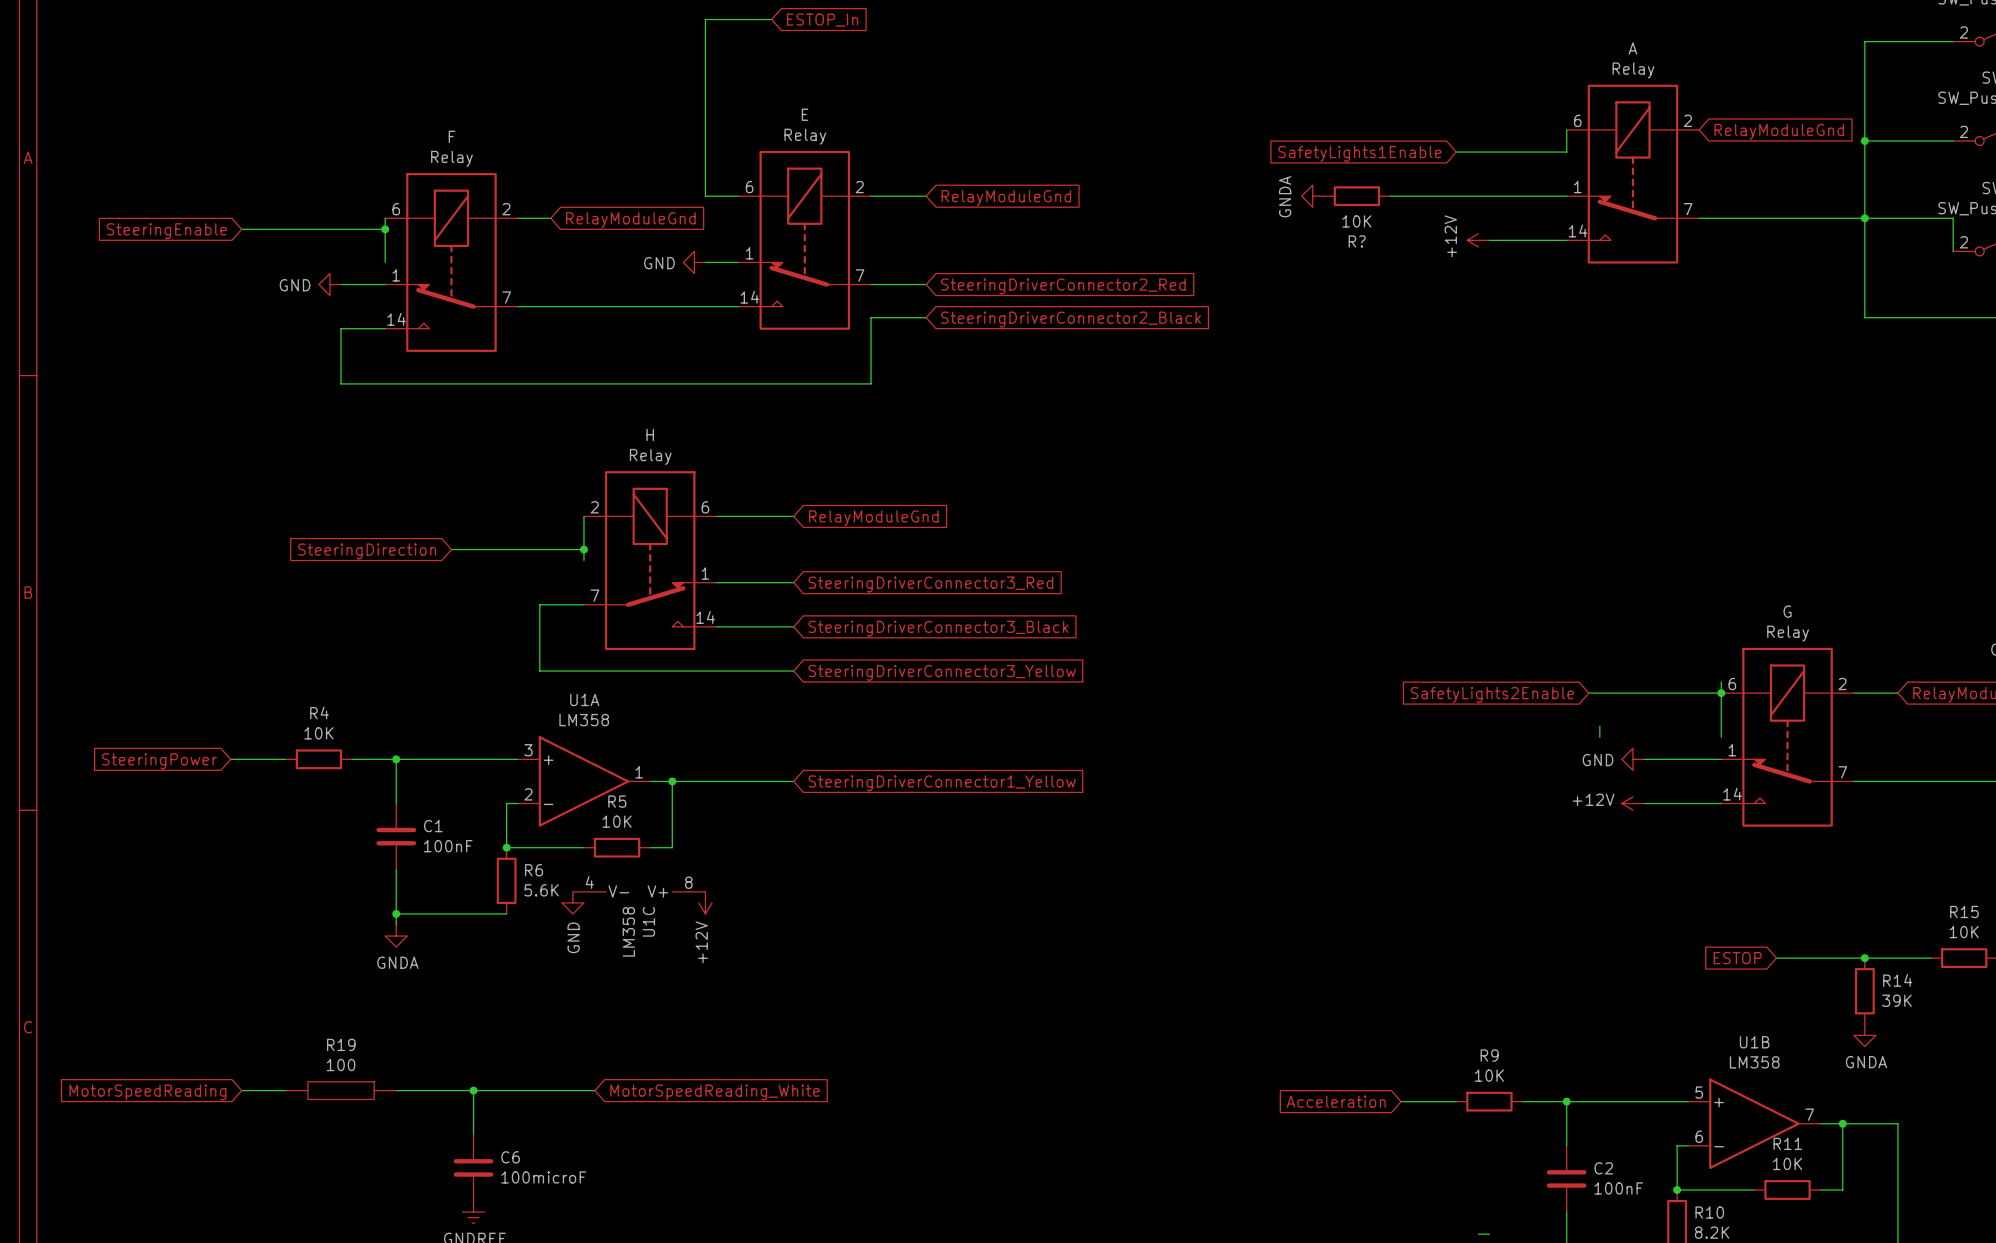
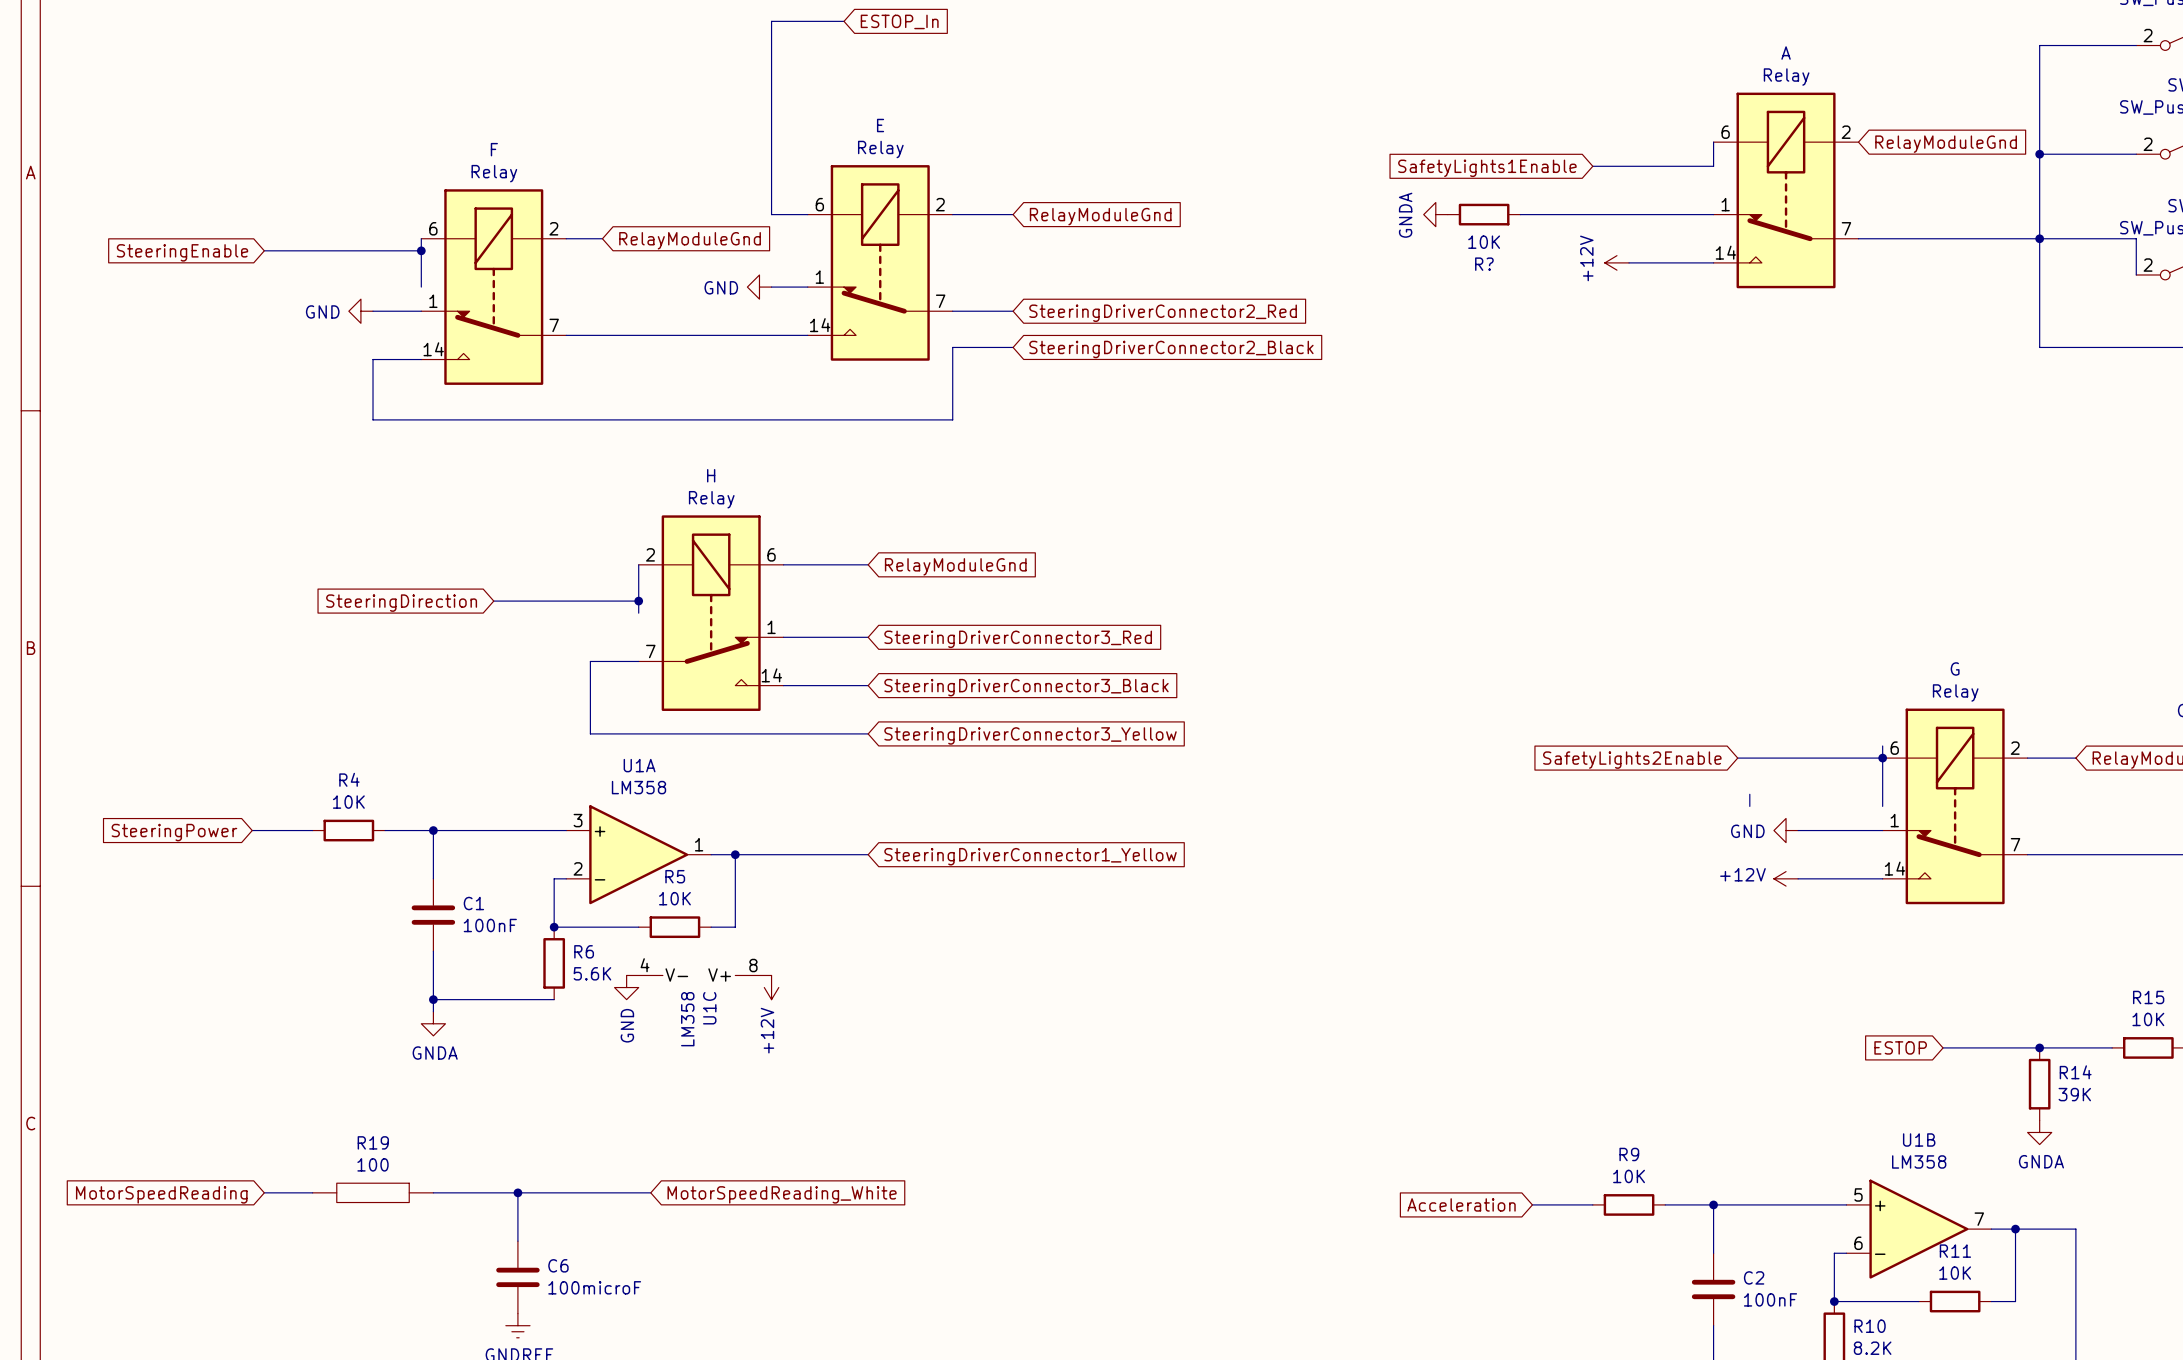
wire: (1478, 1234) (1489, 1234) -> none

